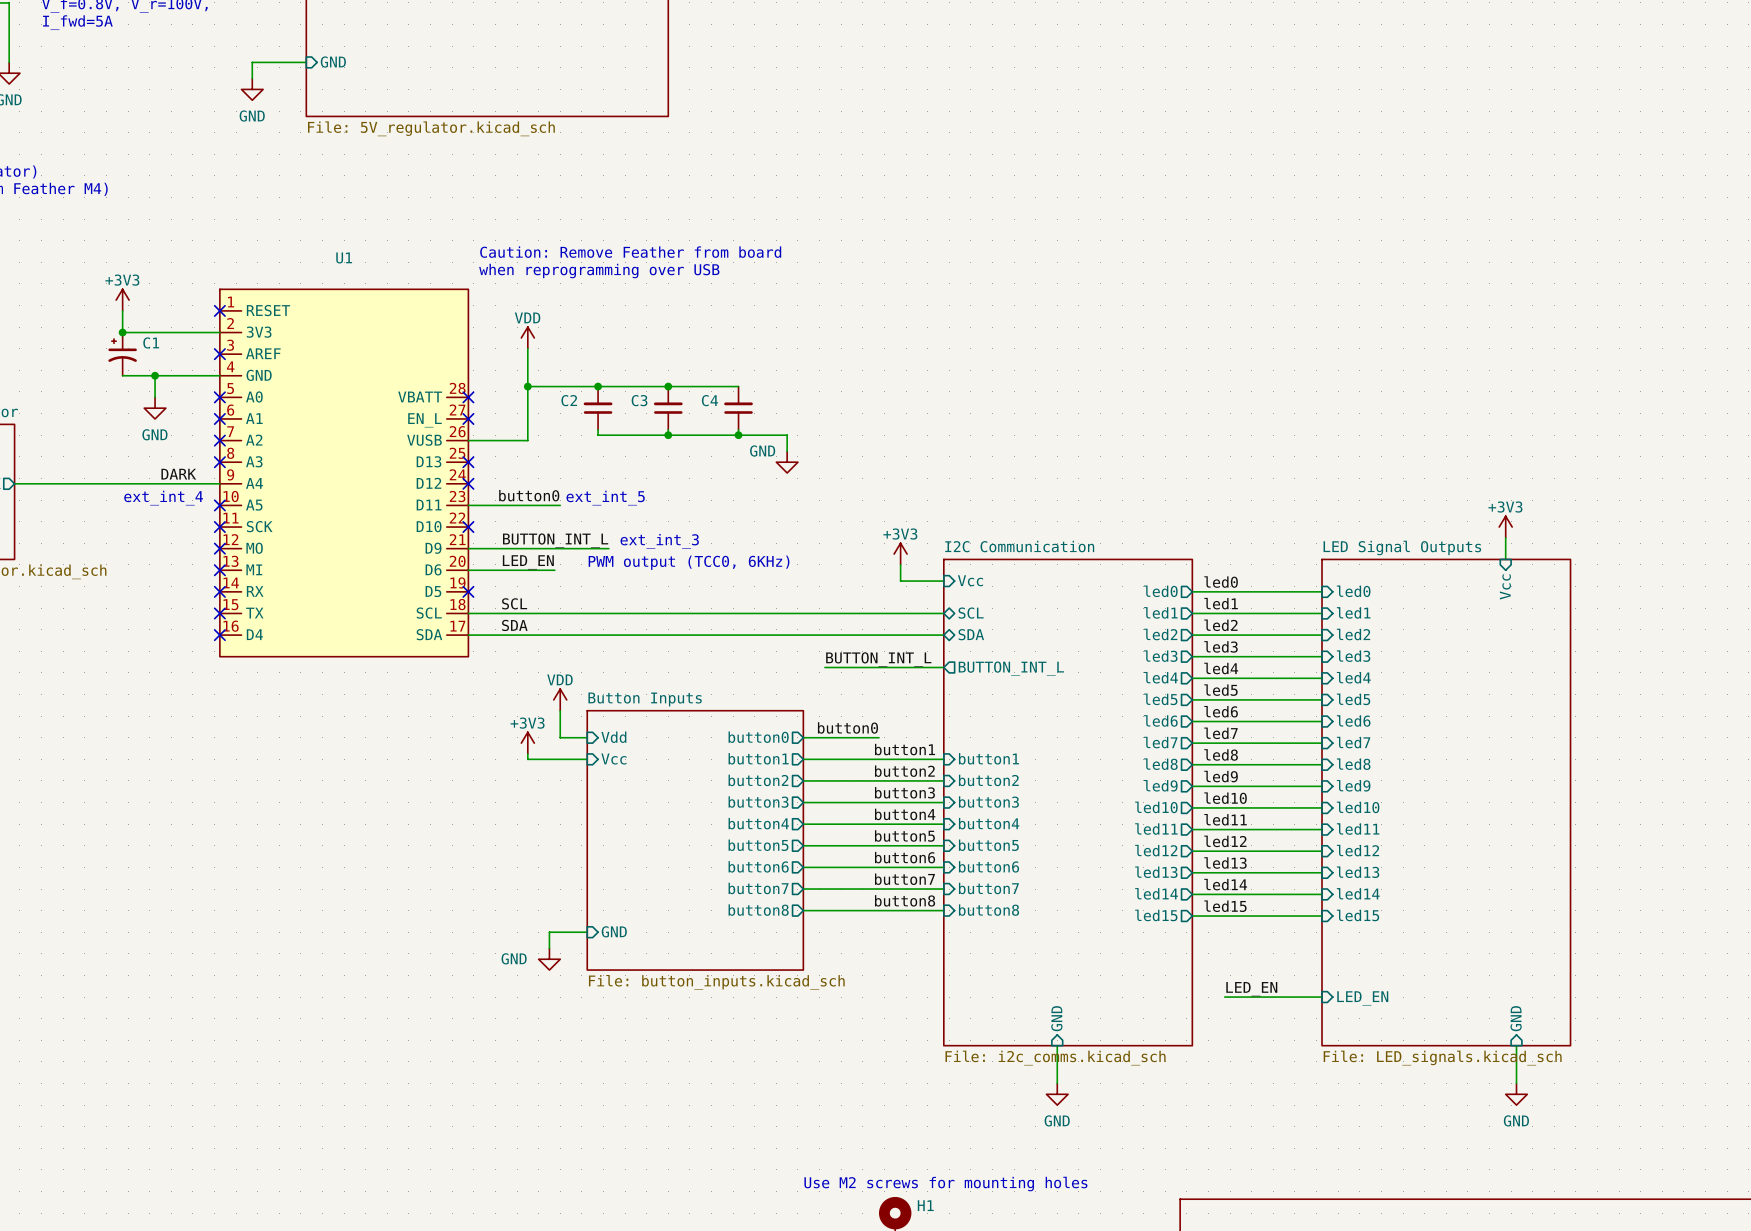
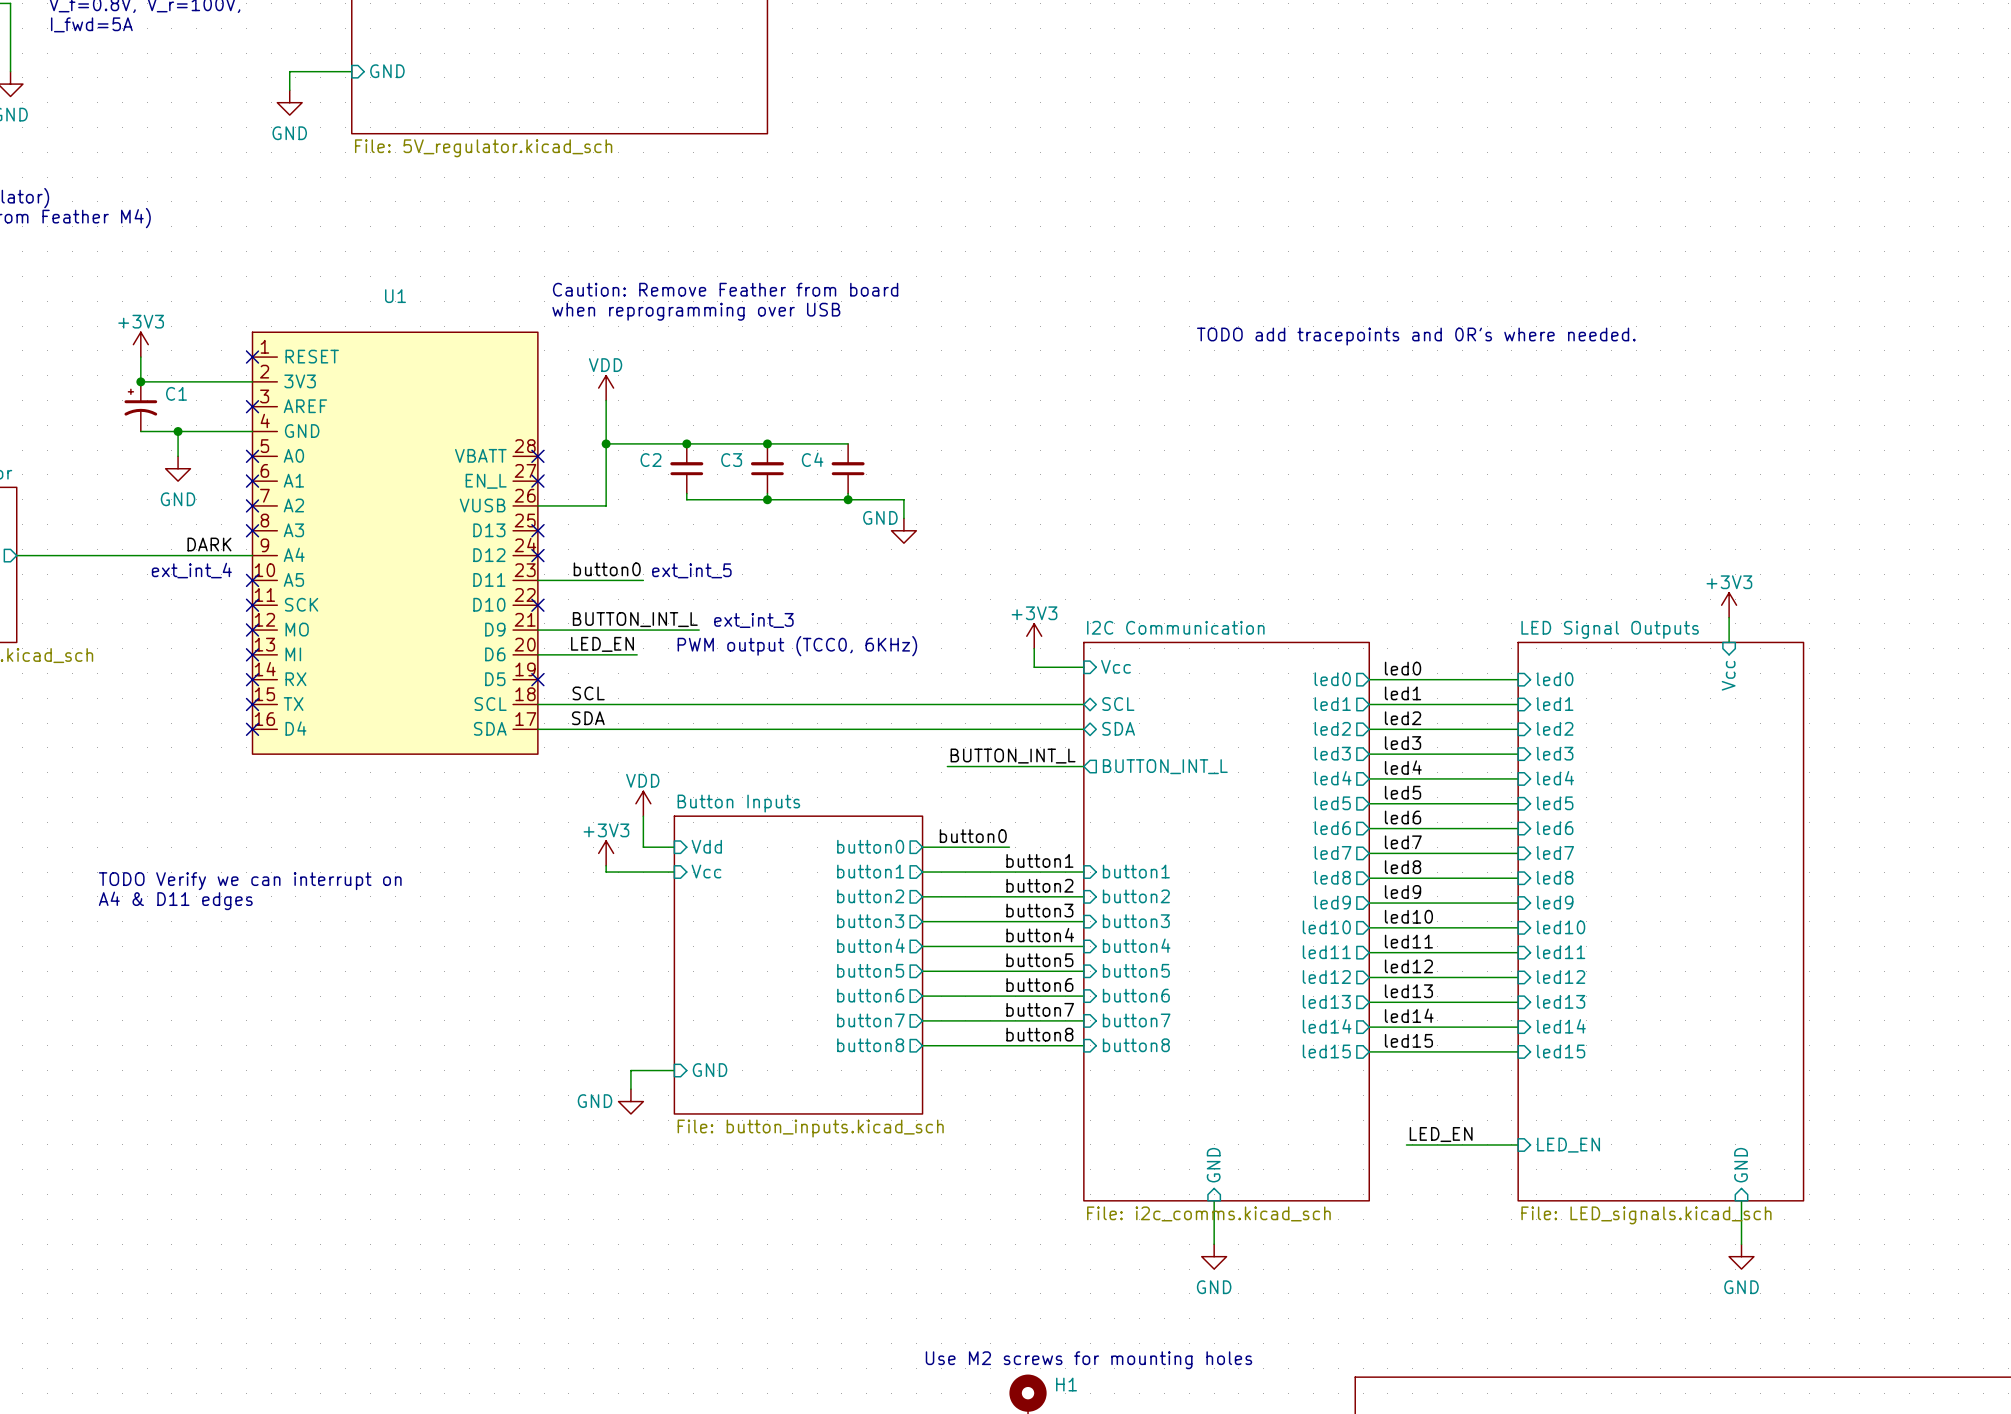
text: none -> TODO add tracepoints and 0R's where needed. (1416, 336)
text: none -> TODO Verify we can interrupt on (250, 881)
text: none -> A4 & D11 edges (175, 900)

